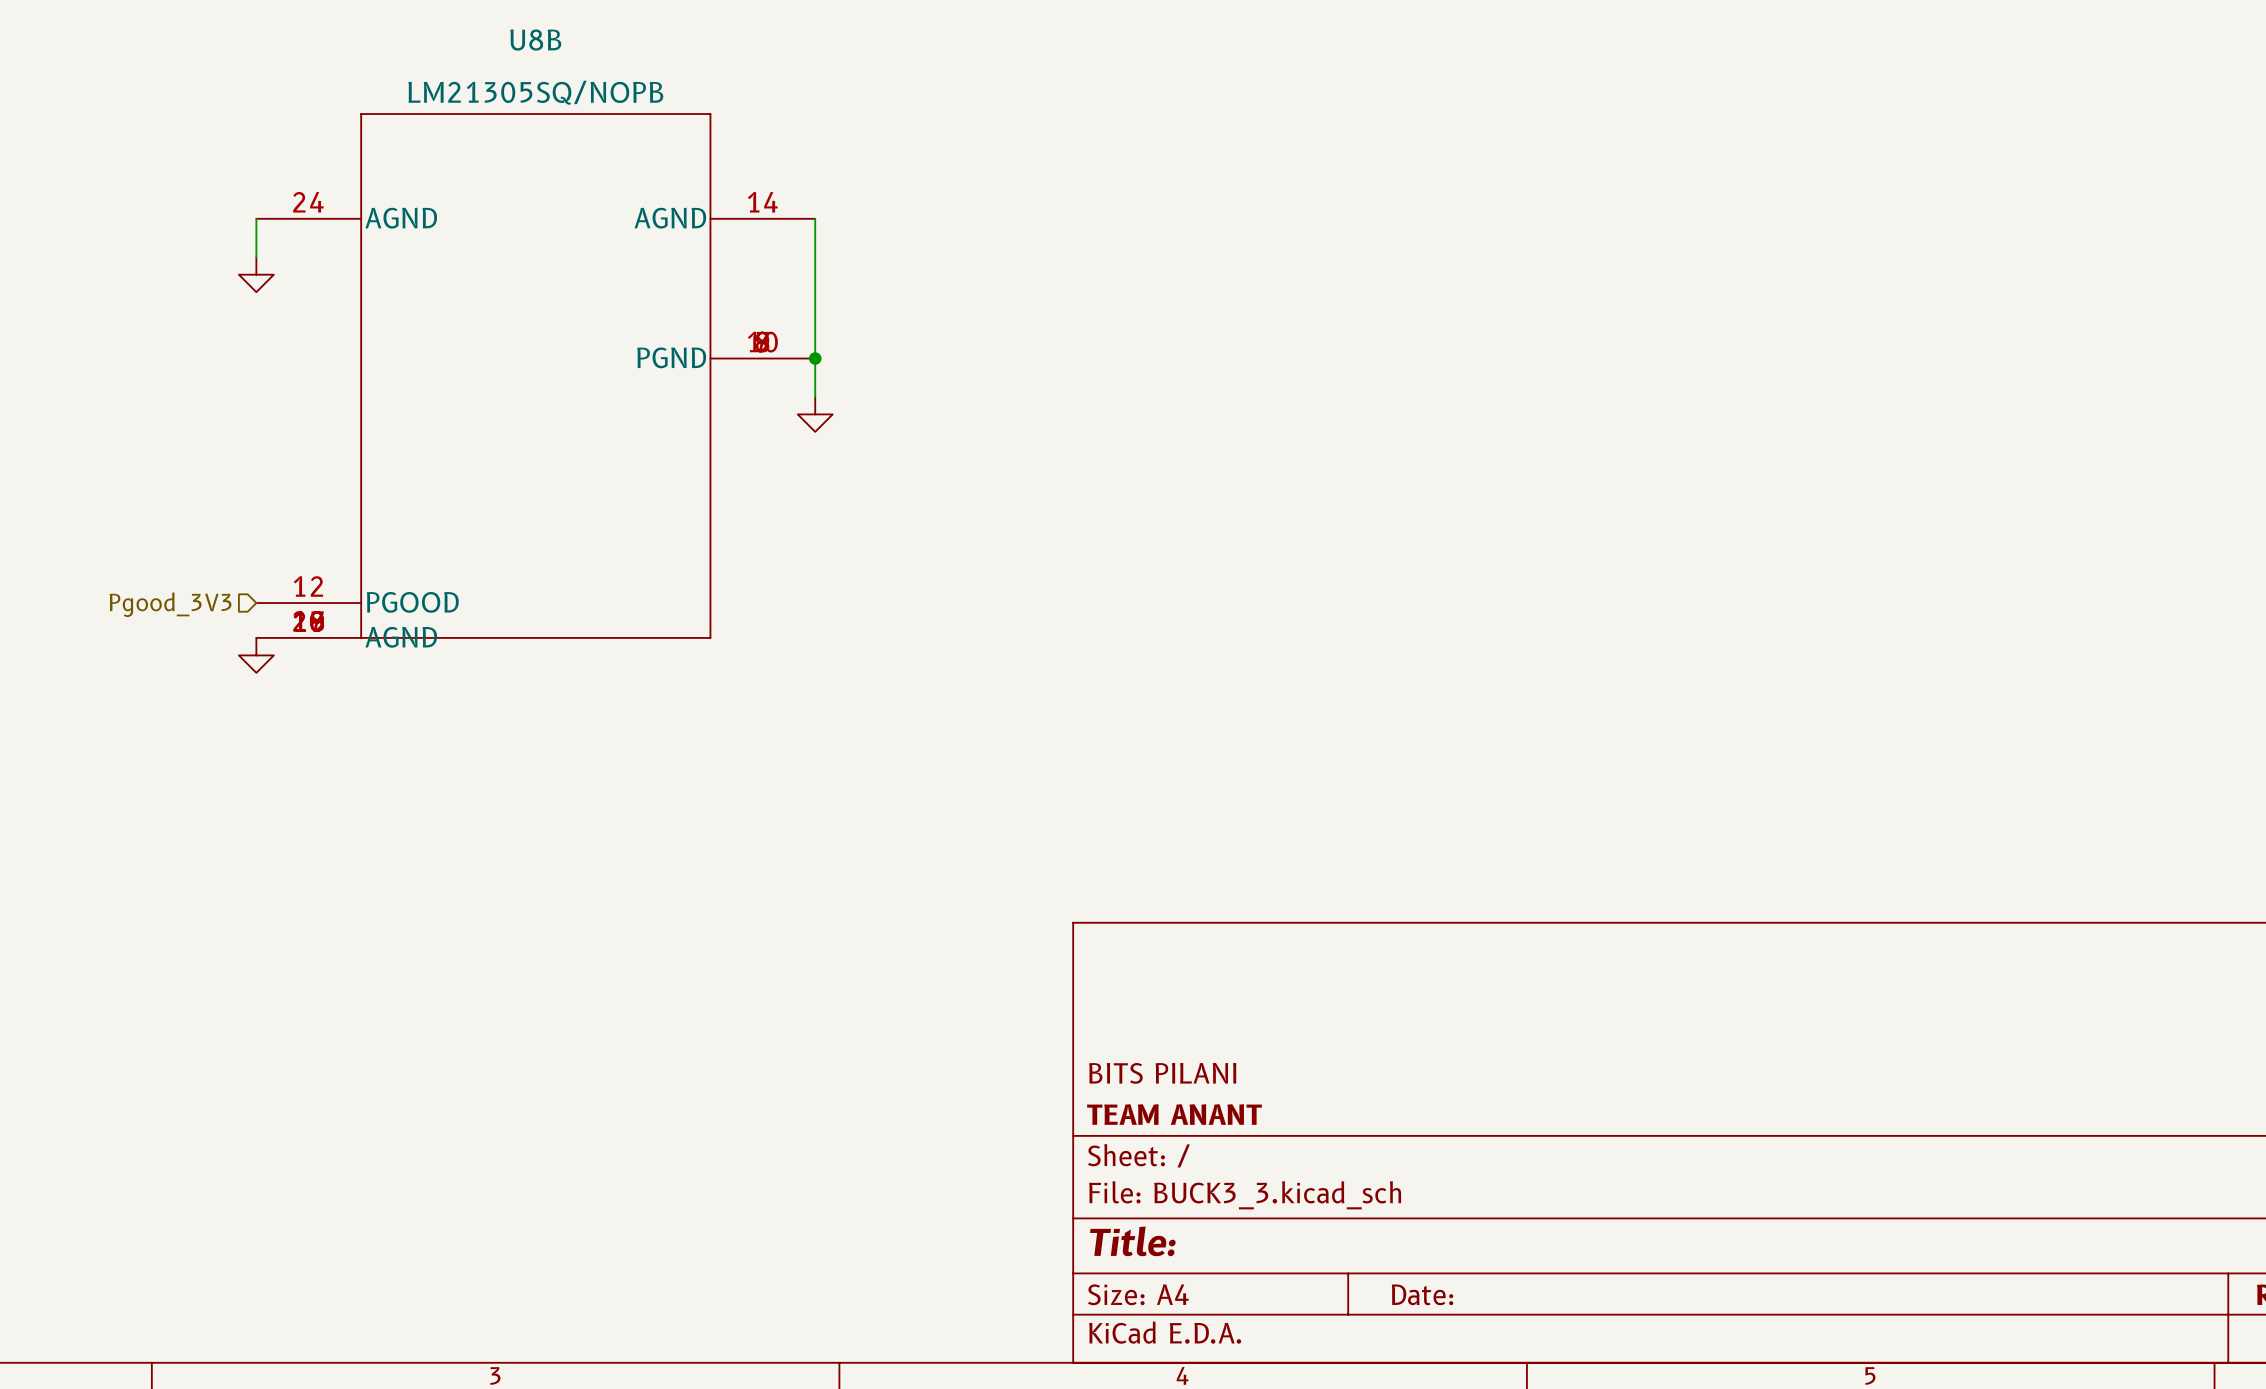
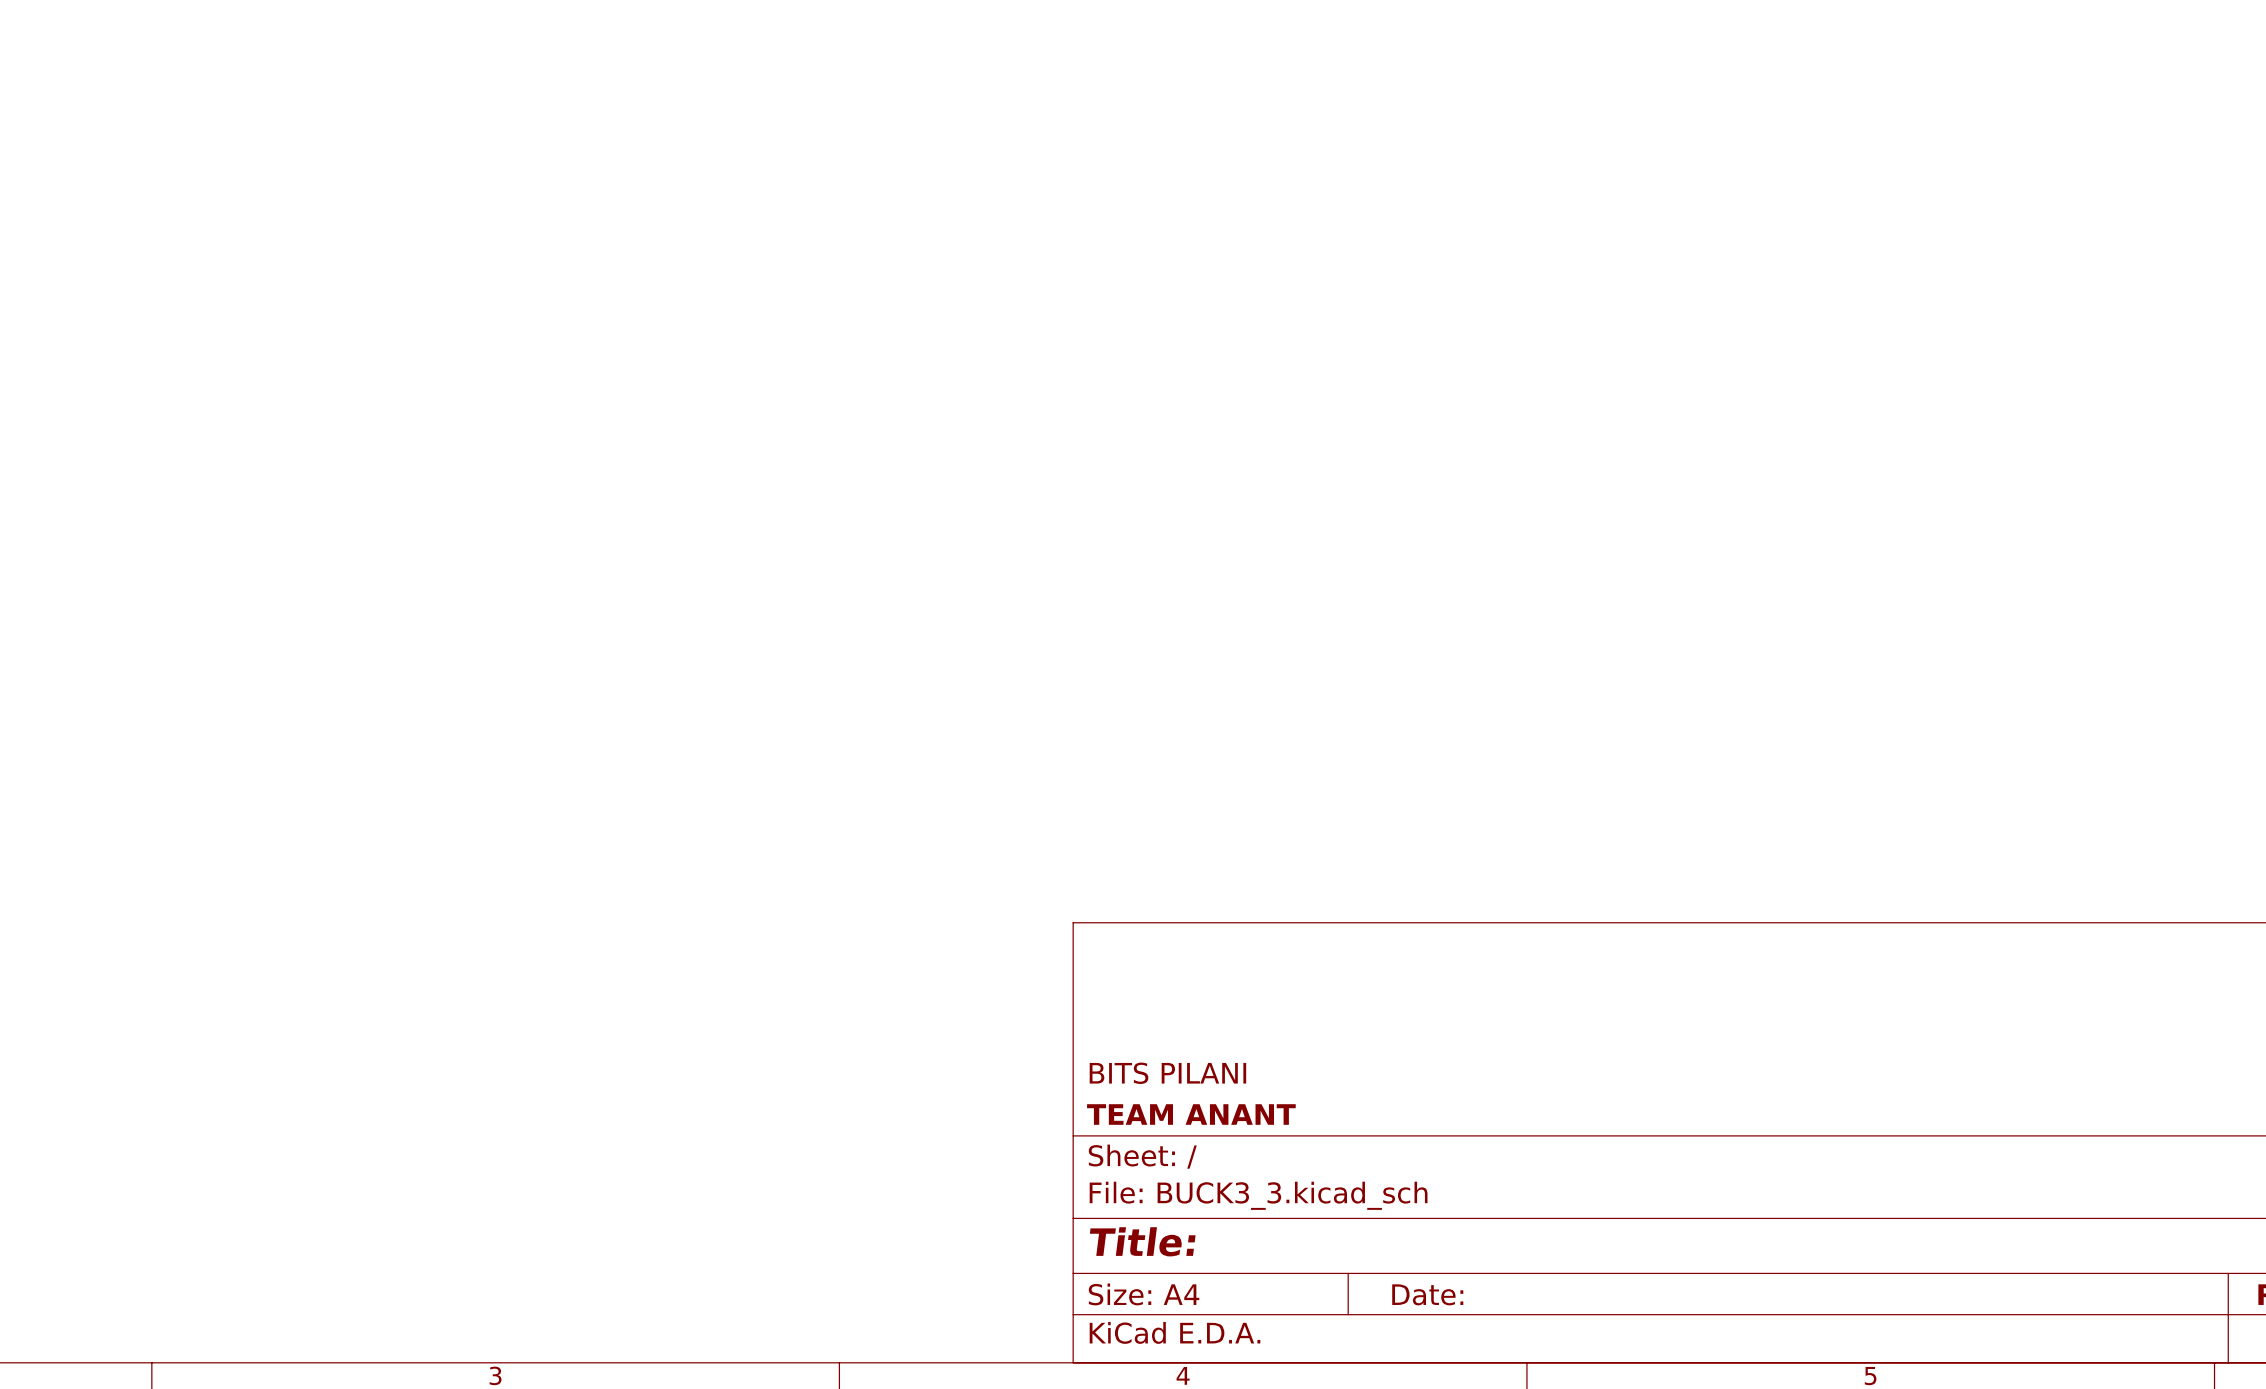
wire: (256, 218) (256, 257) -> none
wire: (815, 218) (815, 396) -> none
power symbol: (256, 274) -> none
junction: (815, 358) -> none
U8B: LM21305SQ/NOPB (535, 375) -> none
power symbol: (815, 414) -> none
hierarchical label: Pgood_3V3 (170, 604) -> none
power symbol: (256, 655) -> none

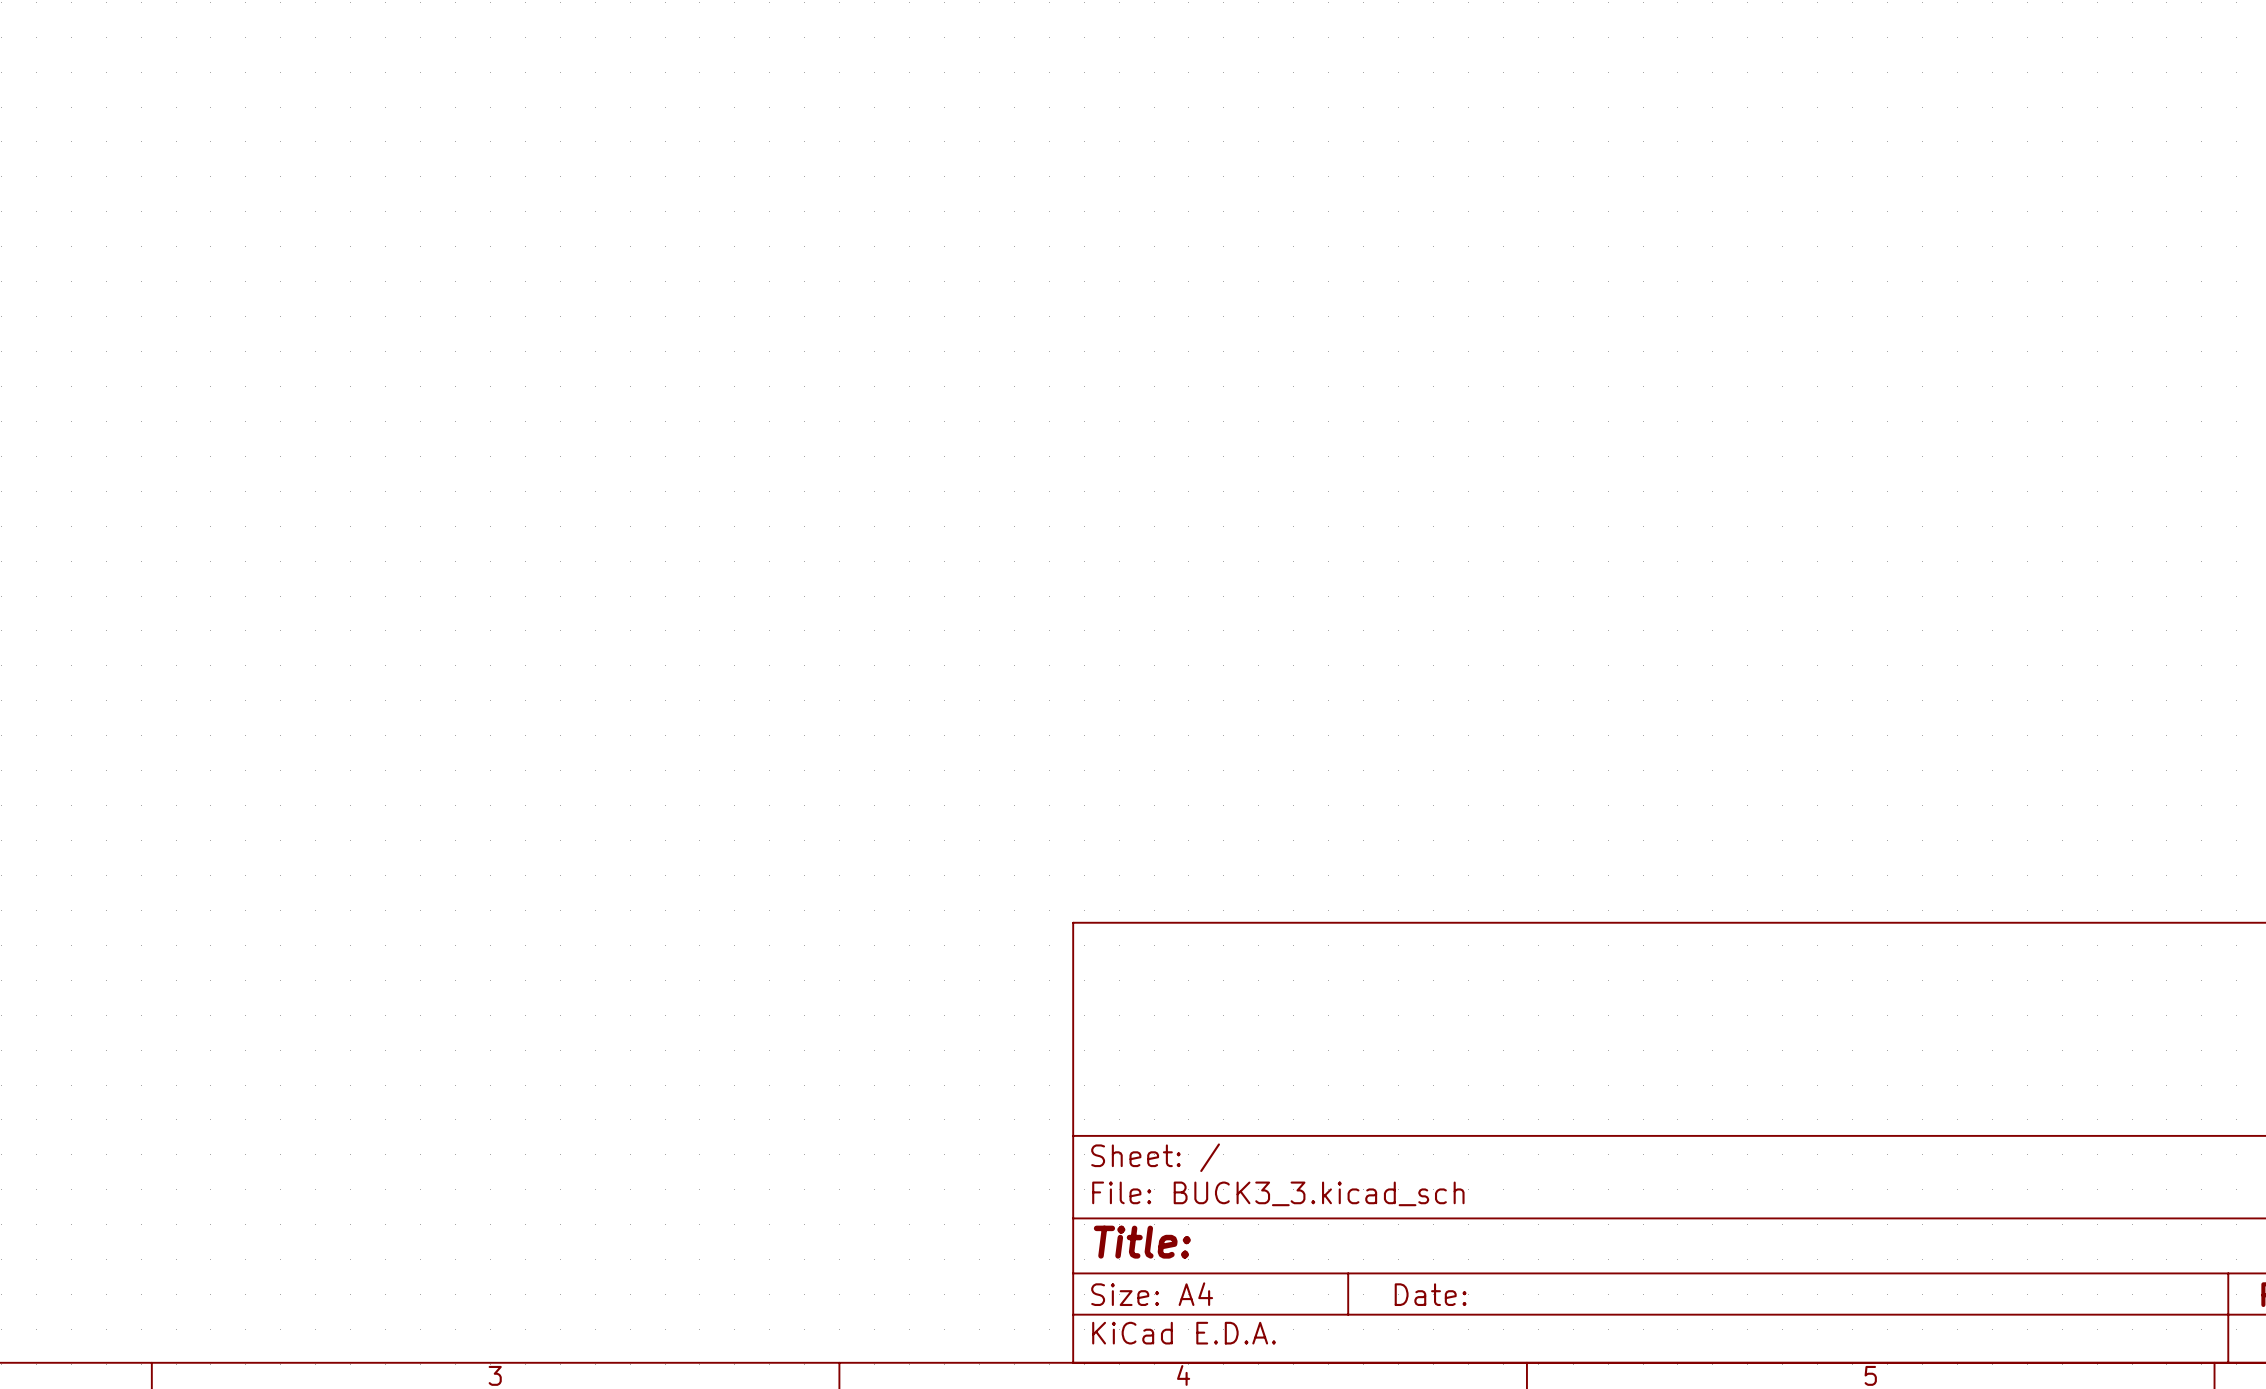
title block: BITS PILANI (1167, 1073) -> none
title block: TEAM ANANT (1191, 1114) -> none

